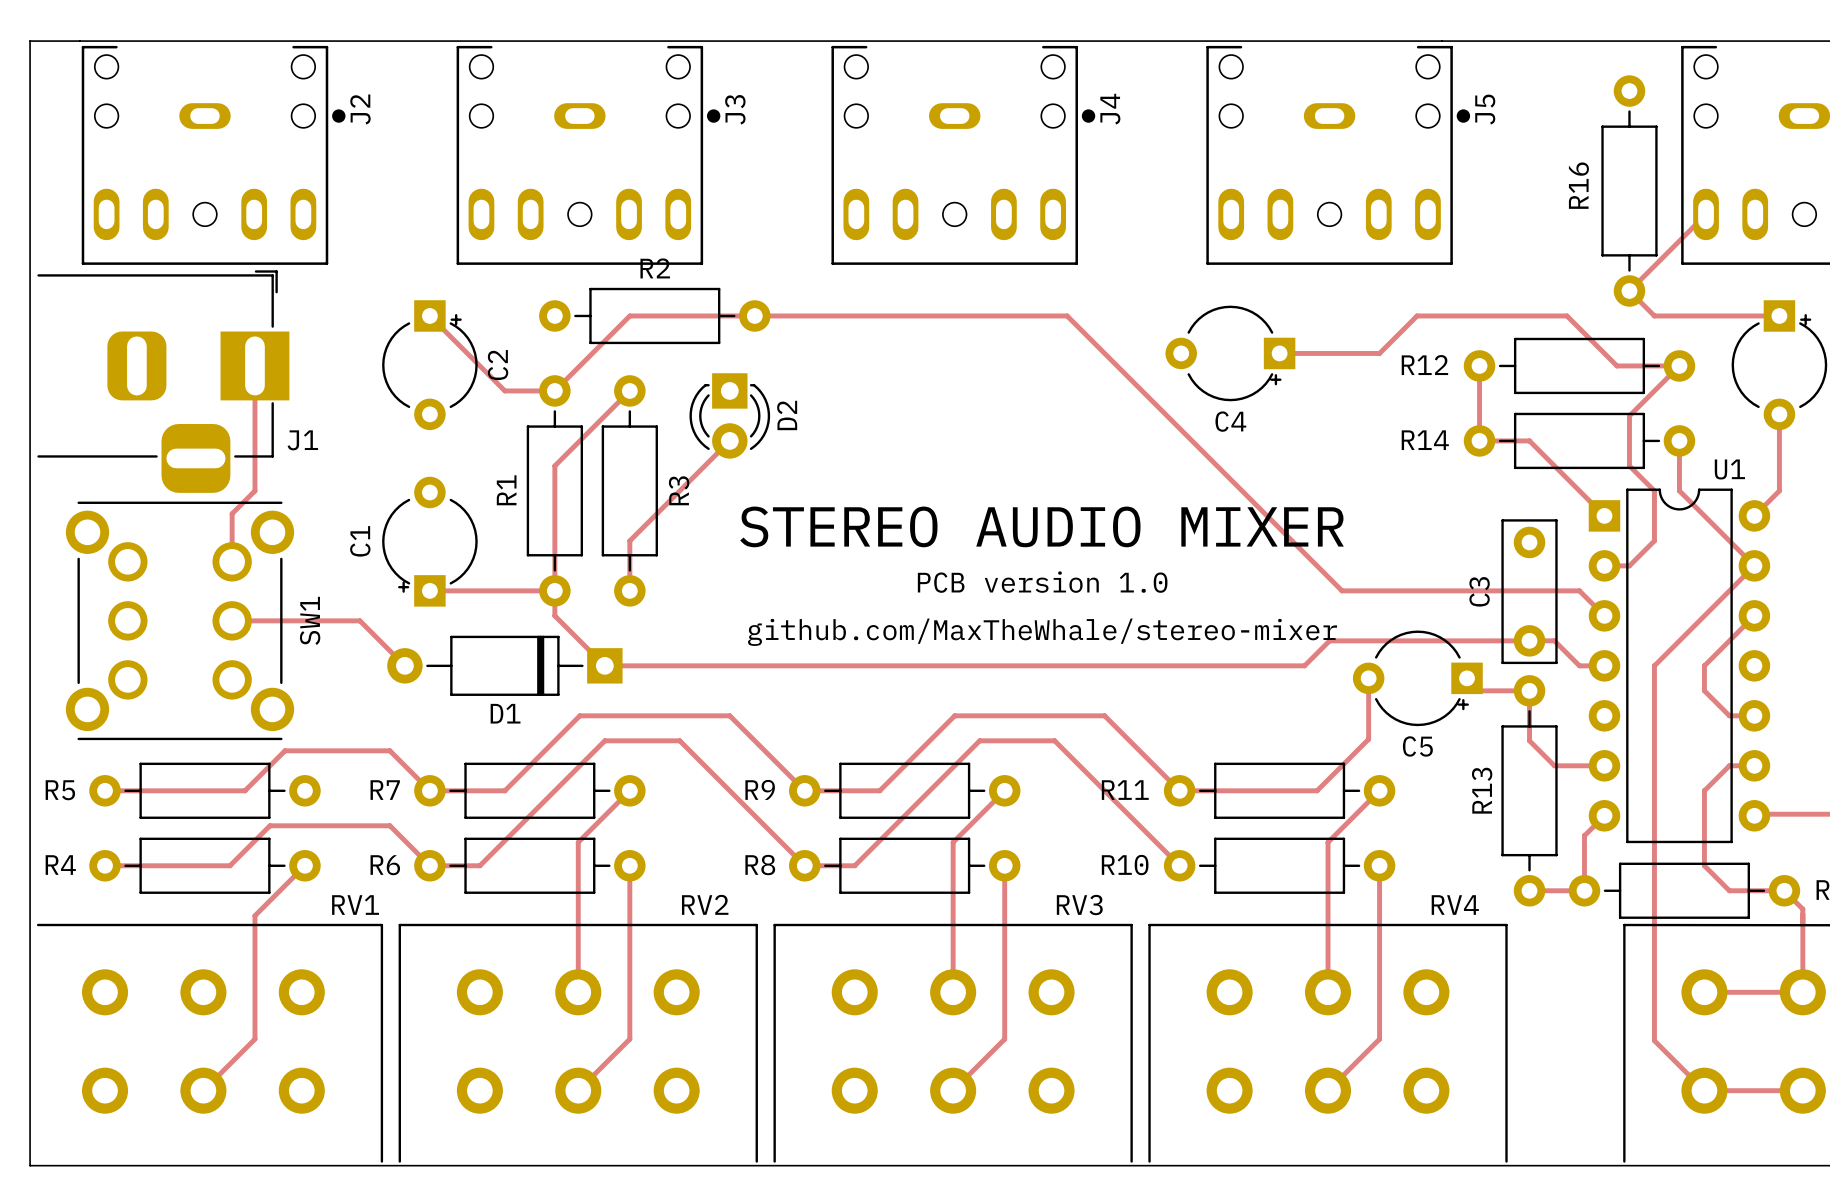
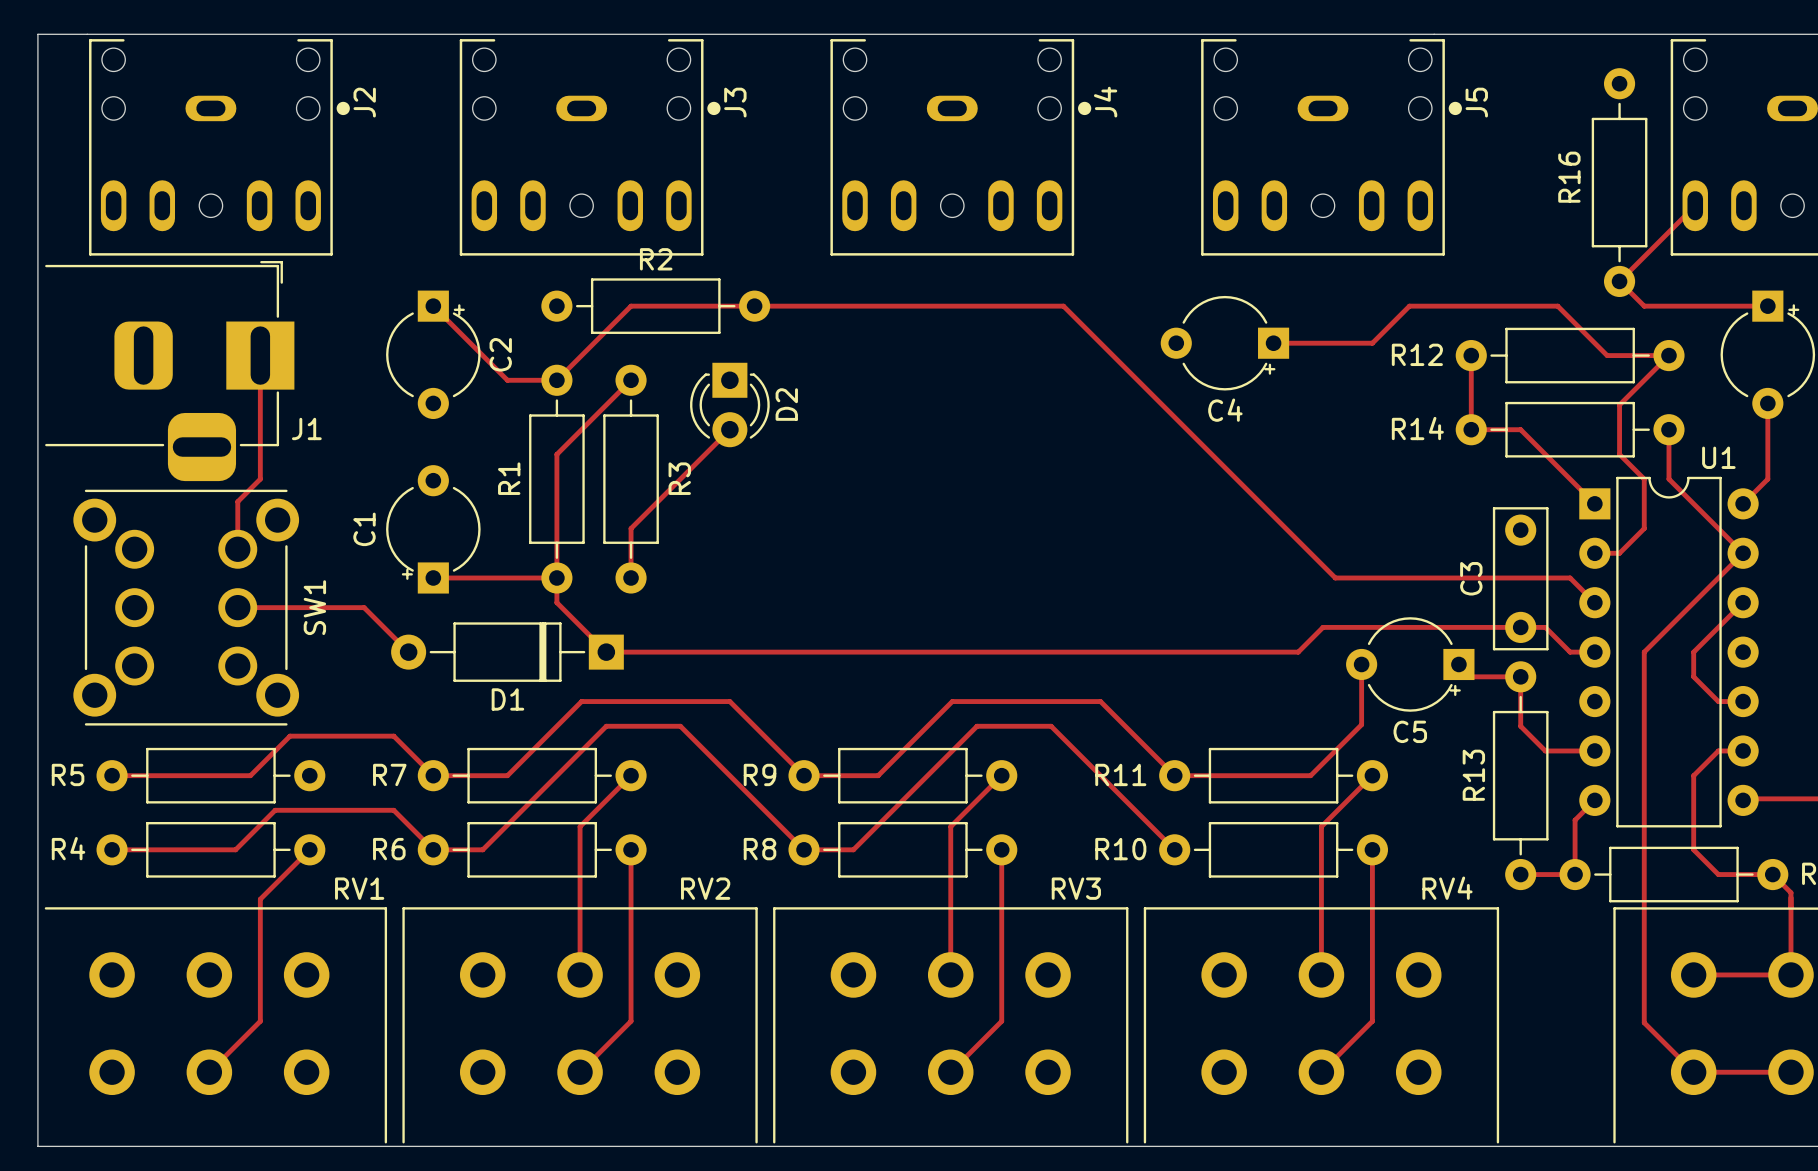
text: STEREO AUDIO MIXER (1042, 526) -> none
text: PCB version 1.0 (1042, 582) -> none
text: github.com/MaxTheWhale/stereo-mixer (1042, 632) -> none

